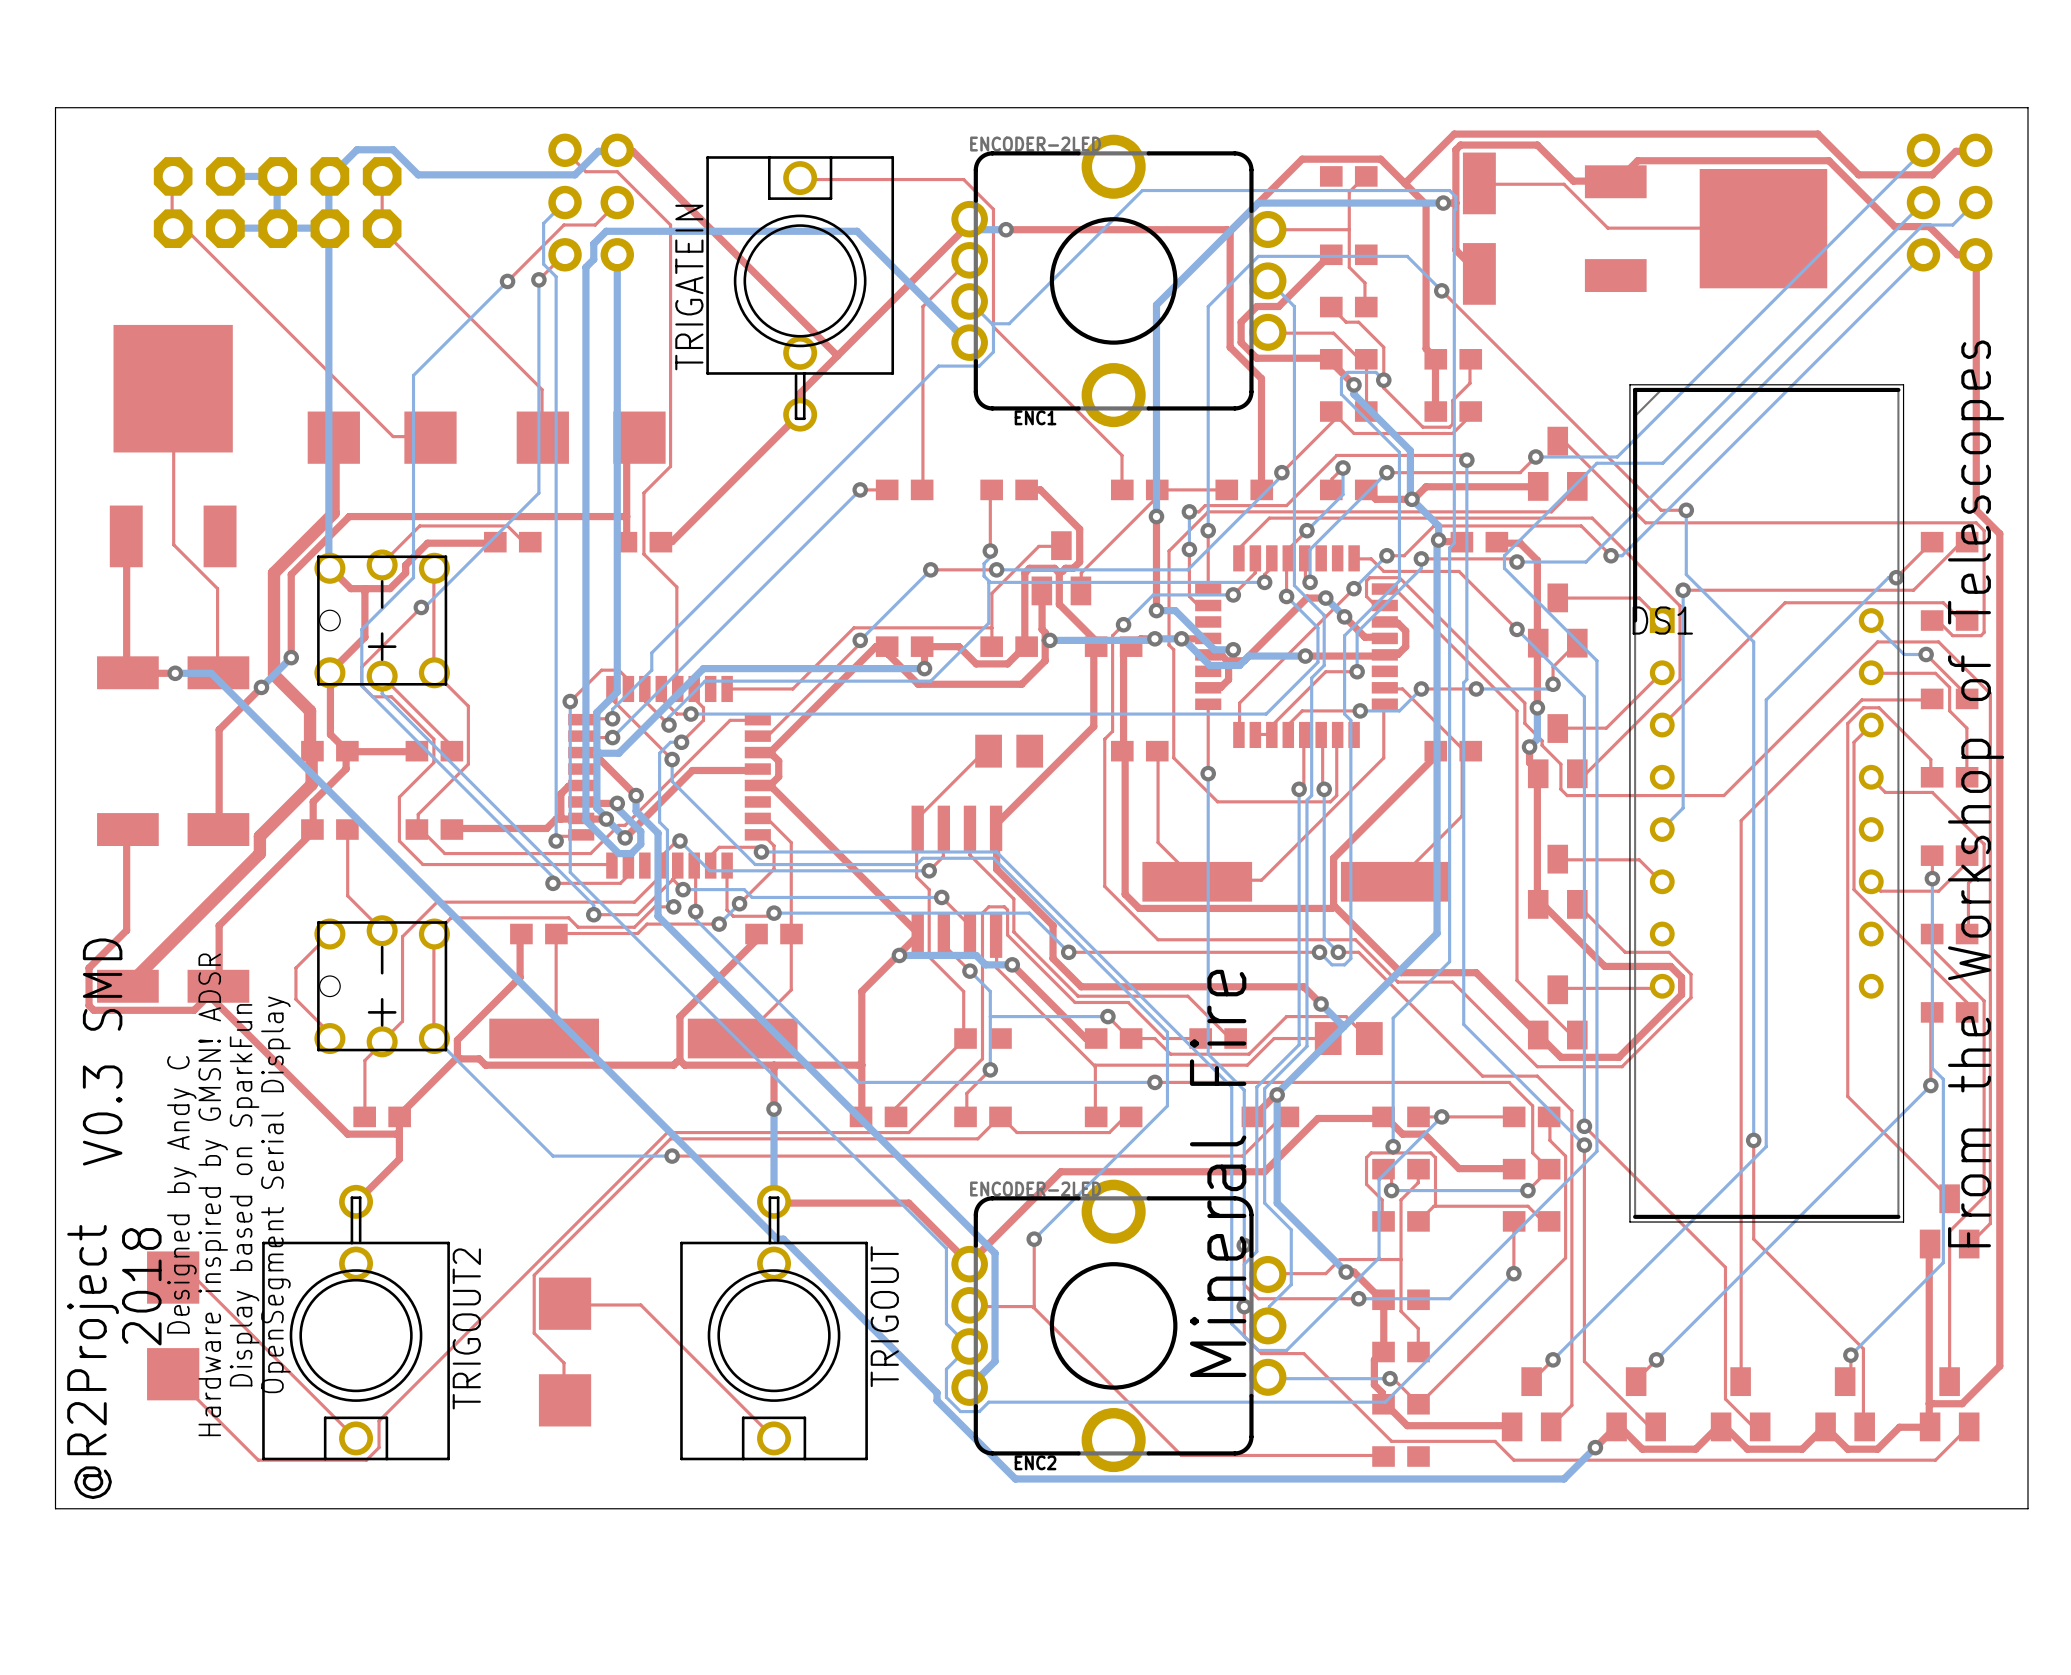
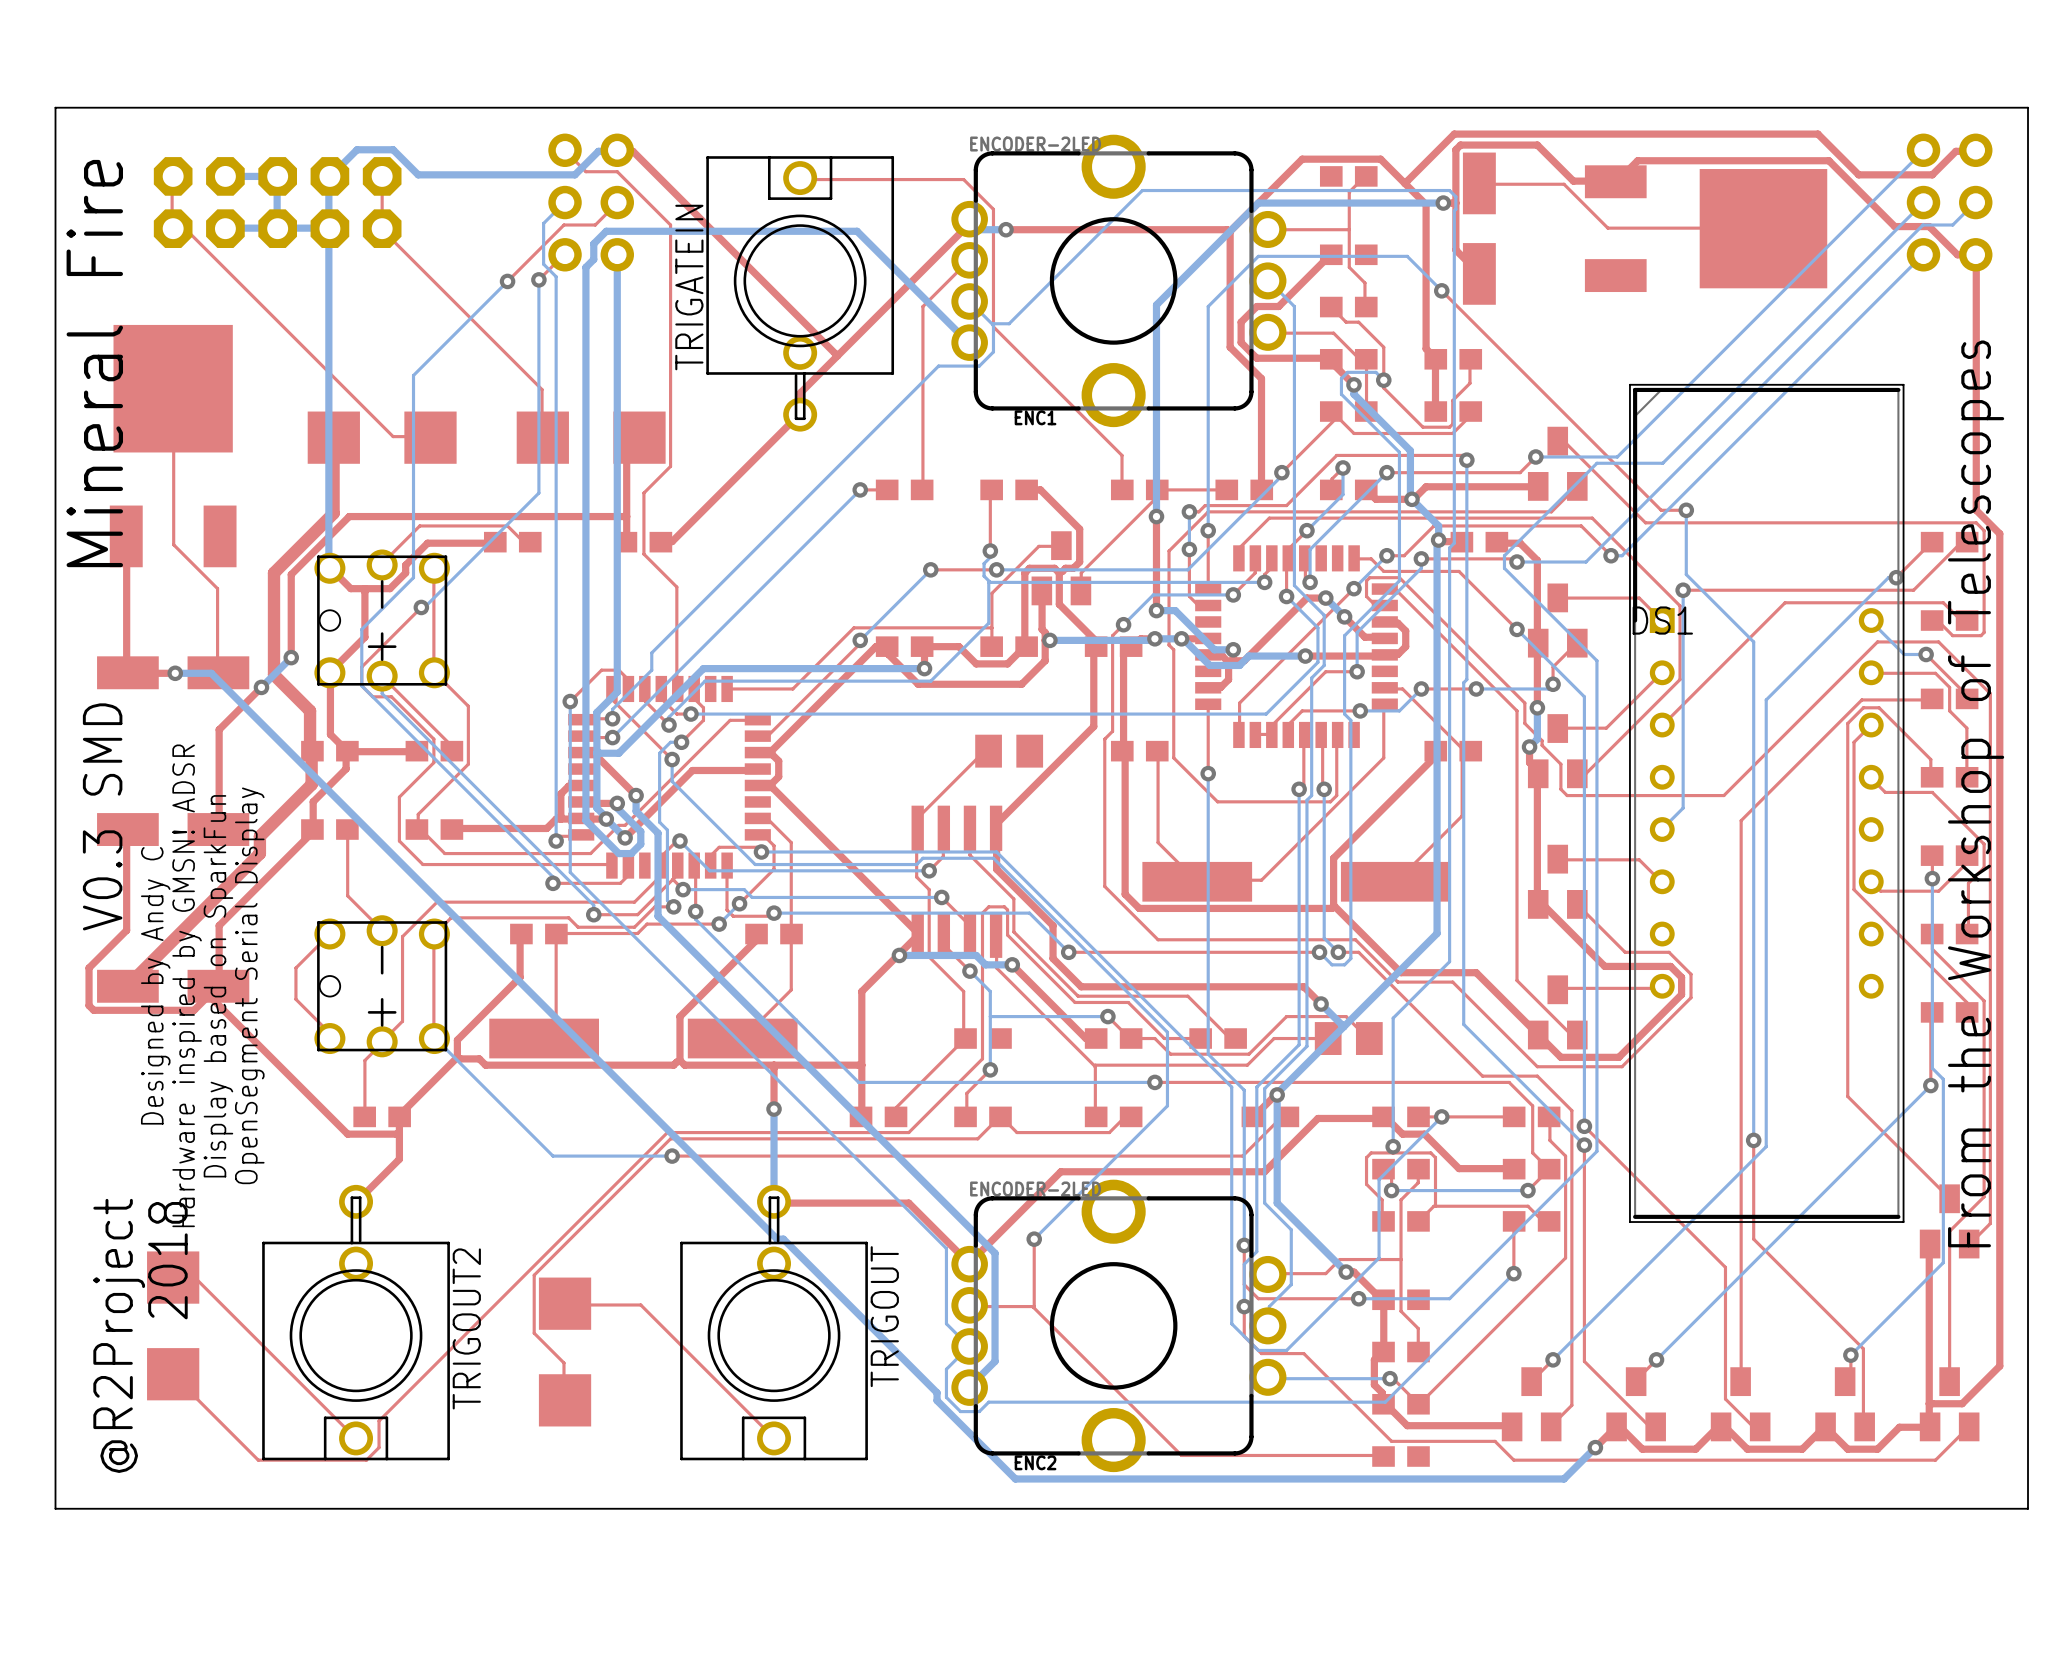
text: none -> Mineral Fire (94, 363)
text position: V0.3 SMD (102, 1052) -> V0.3 SMD (102, 816)
text: Mineral Fire (1218, 1173) -> none
text position: Designed by Andy C (181, 1194) -> Designed by Andy C (155, 985)
text position: Hardware inspired by GMSN! ADSR (213, 1194) -> Hardware inspired by GMSN! ADSR (187, 985)
text position: OpenSegment Serial Display (275, 1194) -> OpenSegment Serial Display (249, 985)
text position: Display based on SparkFun (244, 1195) -> Display based on SparkFun (218, 986)
text position: 2018 (141, 1286) -> 2018 (167, 1260)
text position: @R2Project (93, 1362) -> @R2Project (119, 1335)

